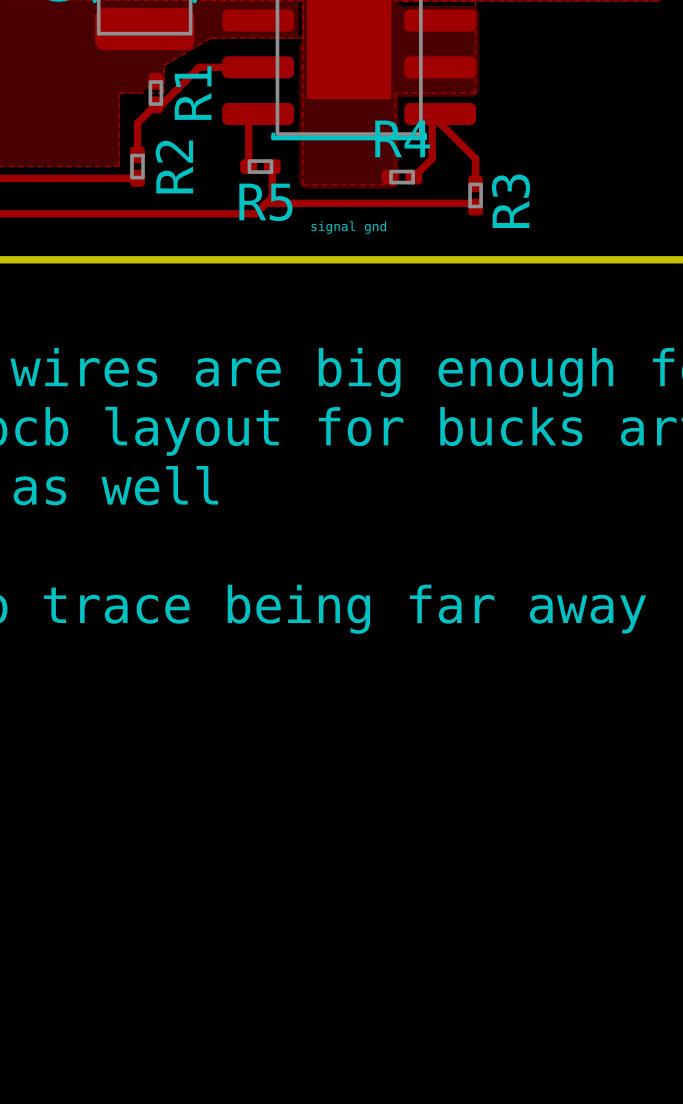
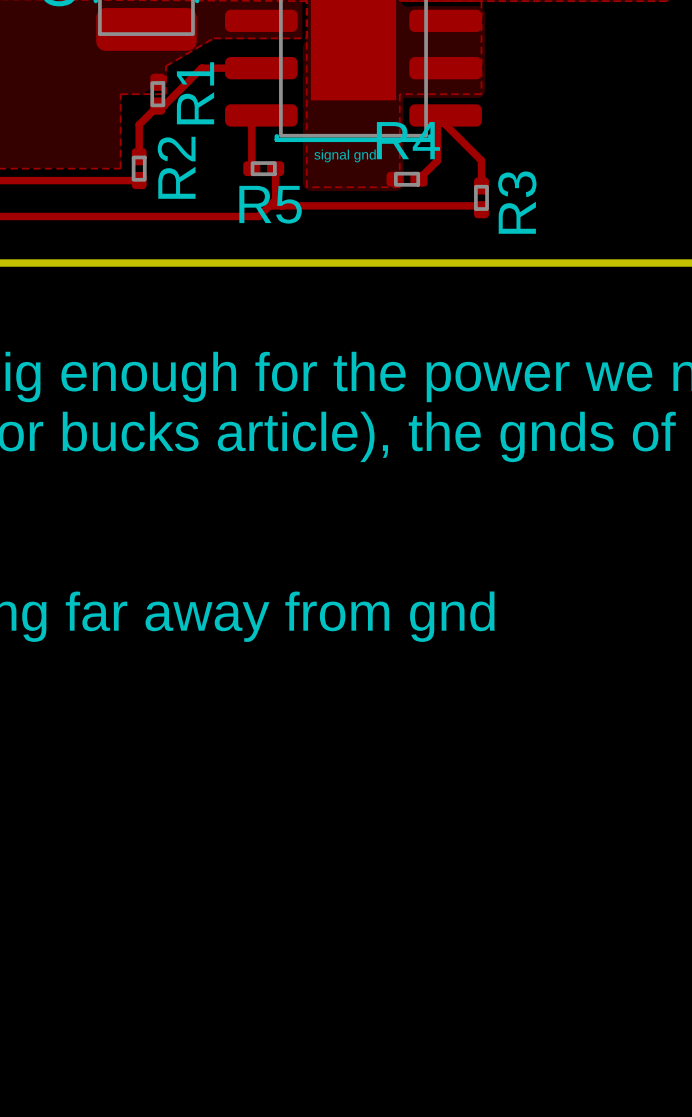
text position: signal gnd (348, 227) -> signal gnd (345, 155)

